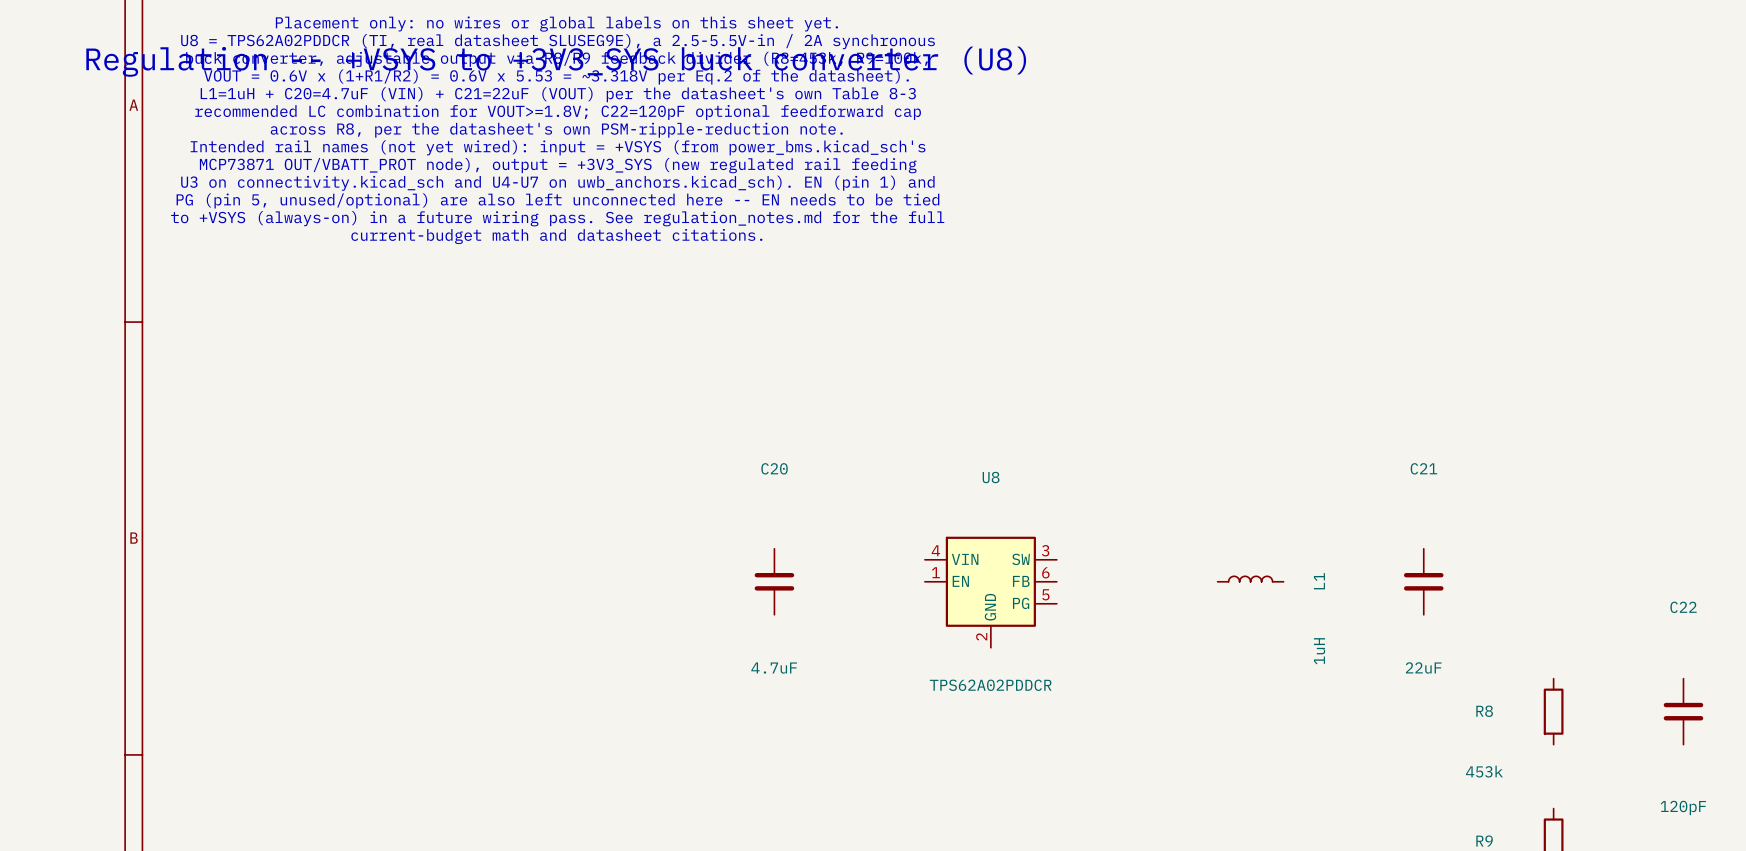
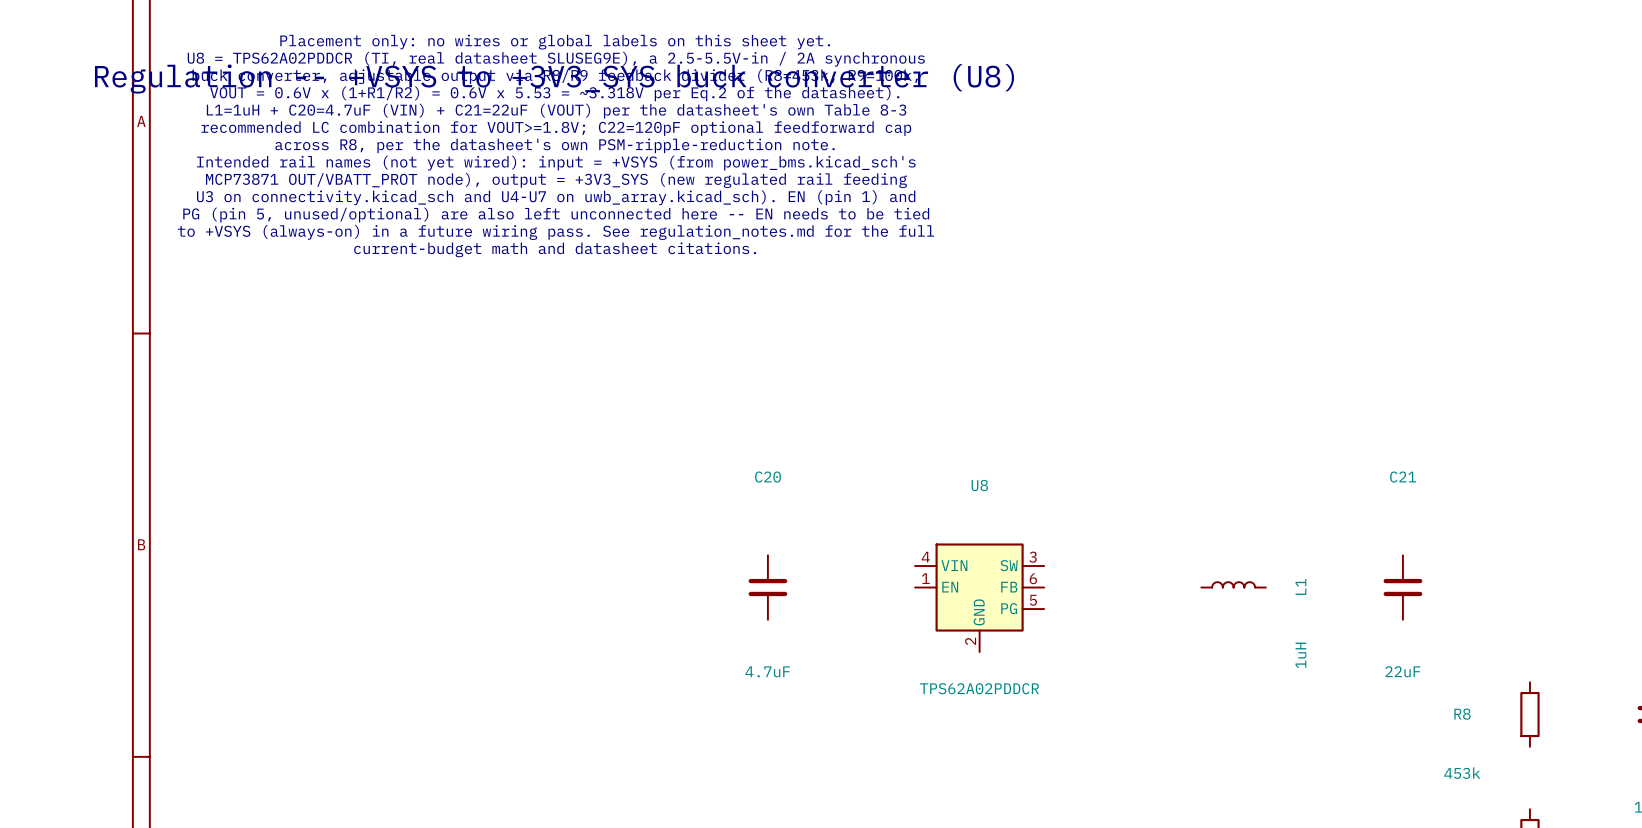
text: U3 on connectivity.kicad_sch and U4-U7 on uwb_anchors.kicad_sch). EN (pin 1) and (557, 183) -> U3 on connectivity.kicad_sch and U4-U7 on uwb_array.kicad_sch). EN (pin 1) and (556, 197)

